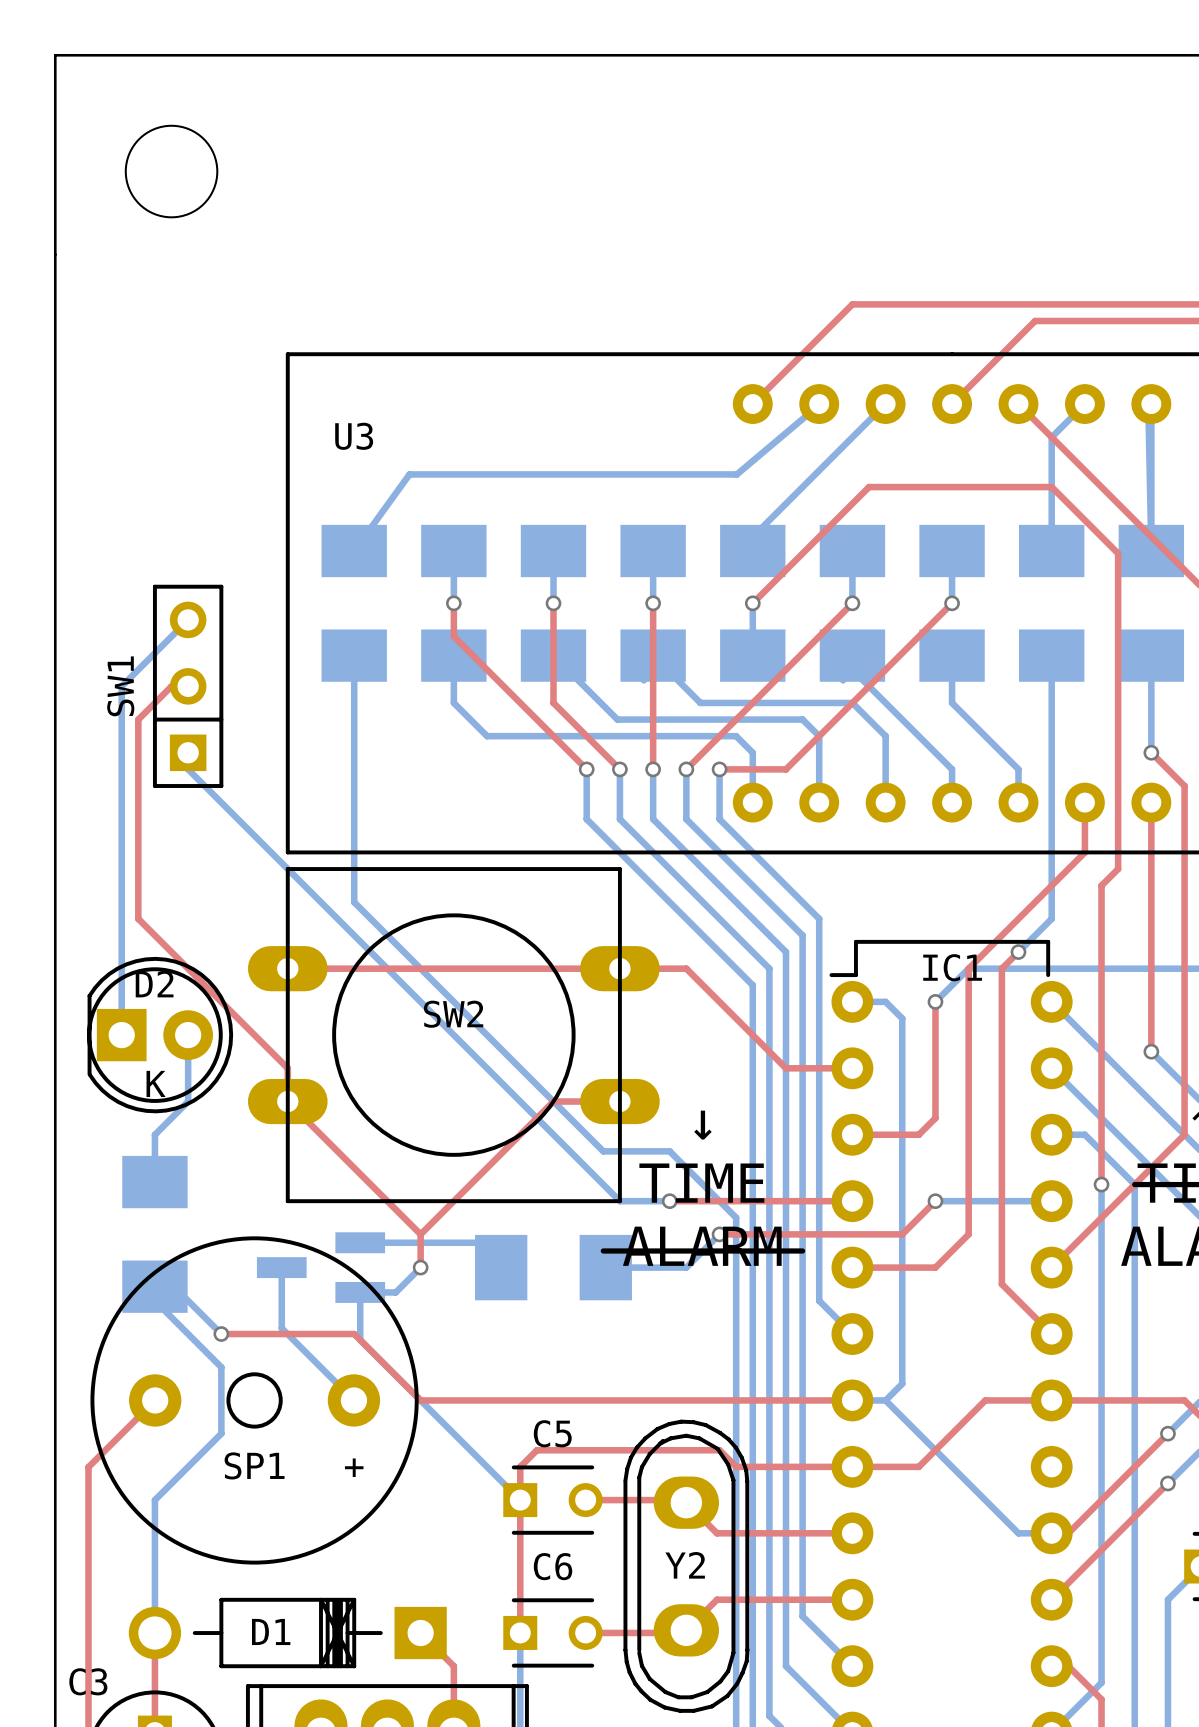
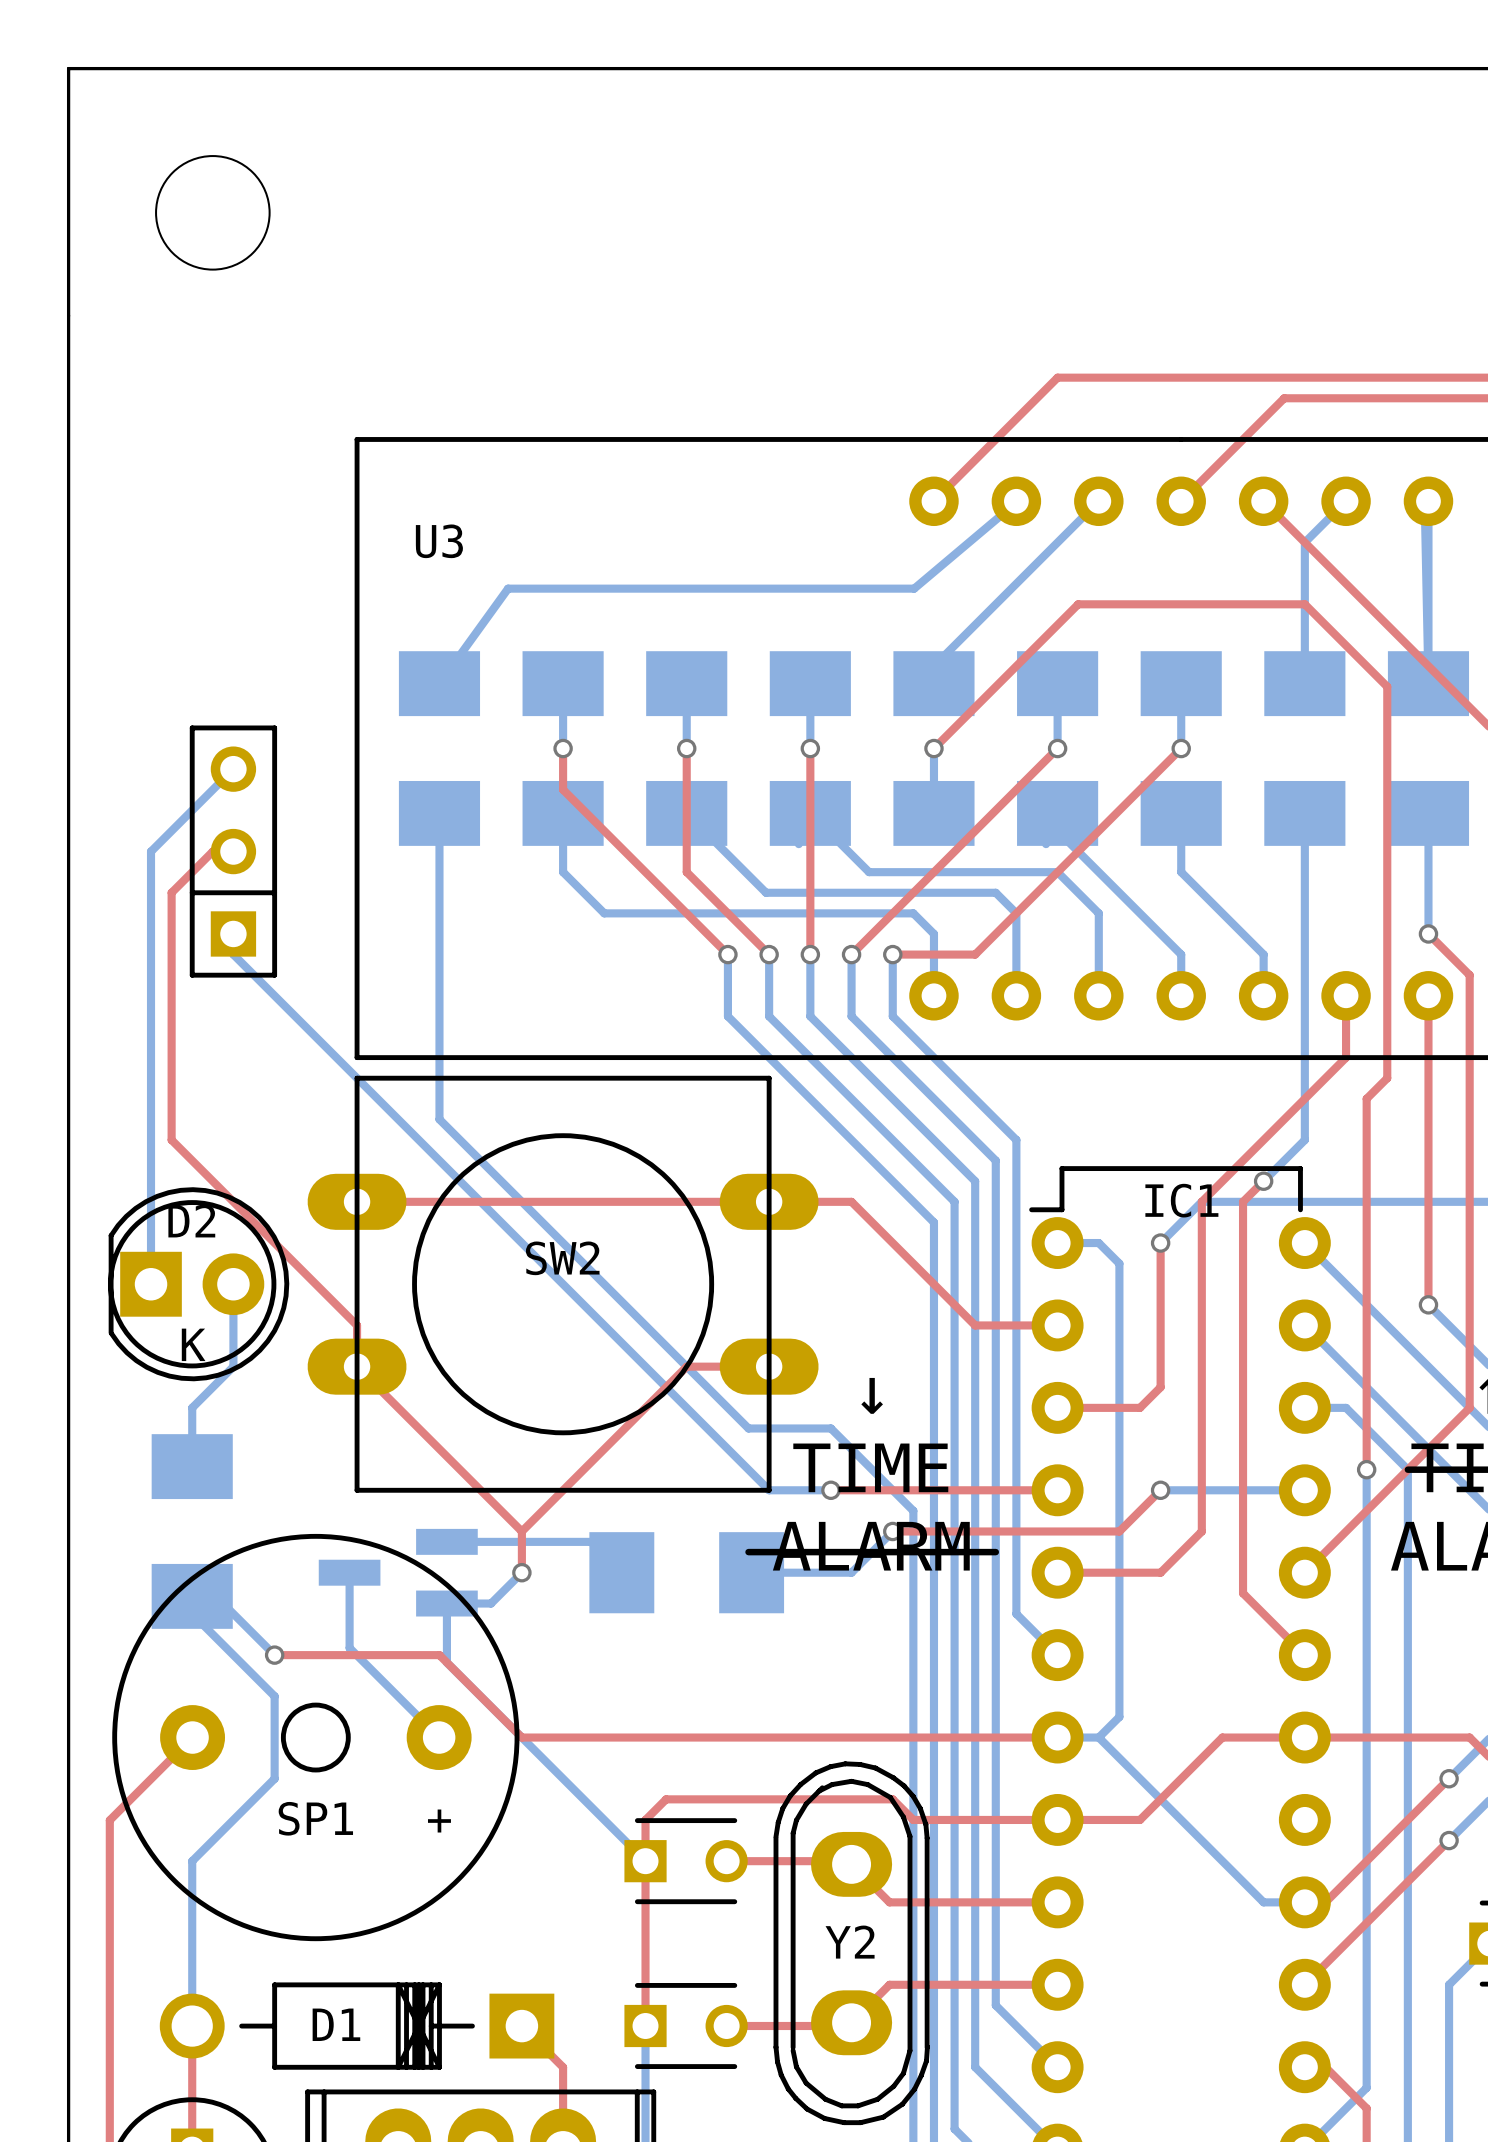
SW1 name: SW1 (120, 686) -> none
C5 name: C5 (552, 1433) -> none
C6 name: C6 (553, 1566) -> none
C3 name: C3 (88, 1681) -> none

